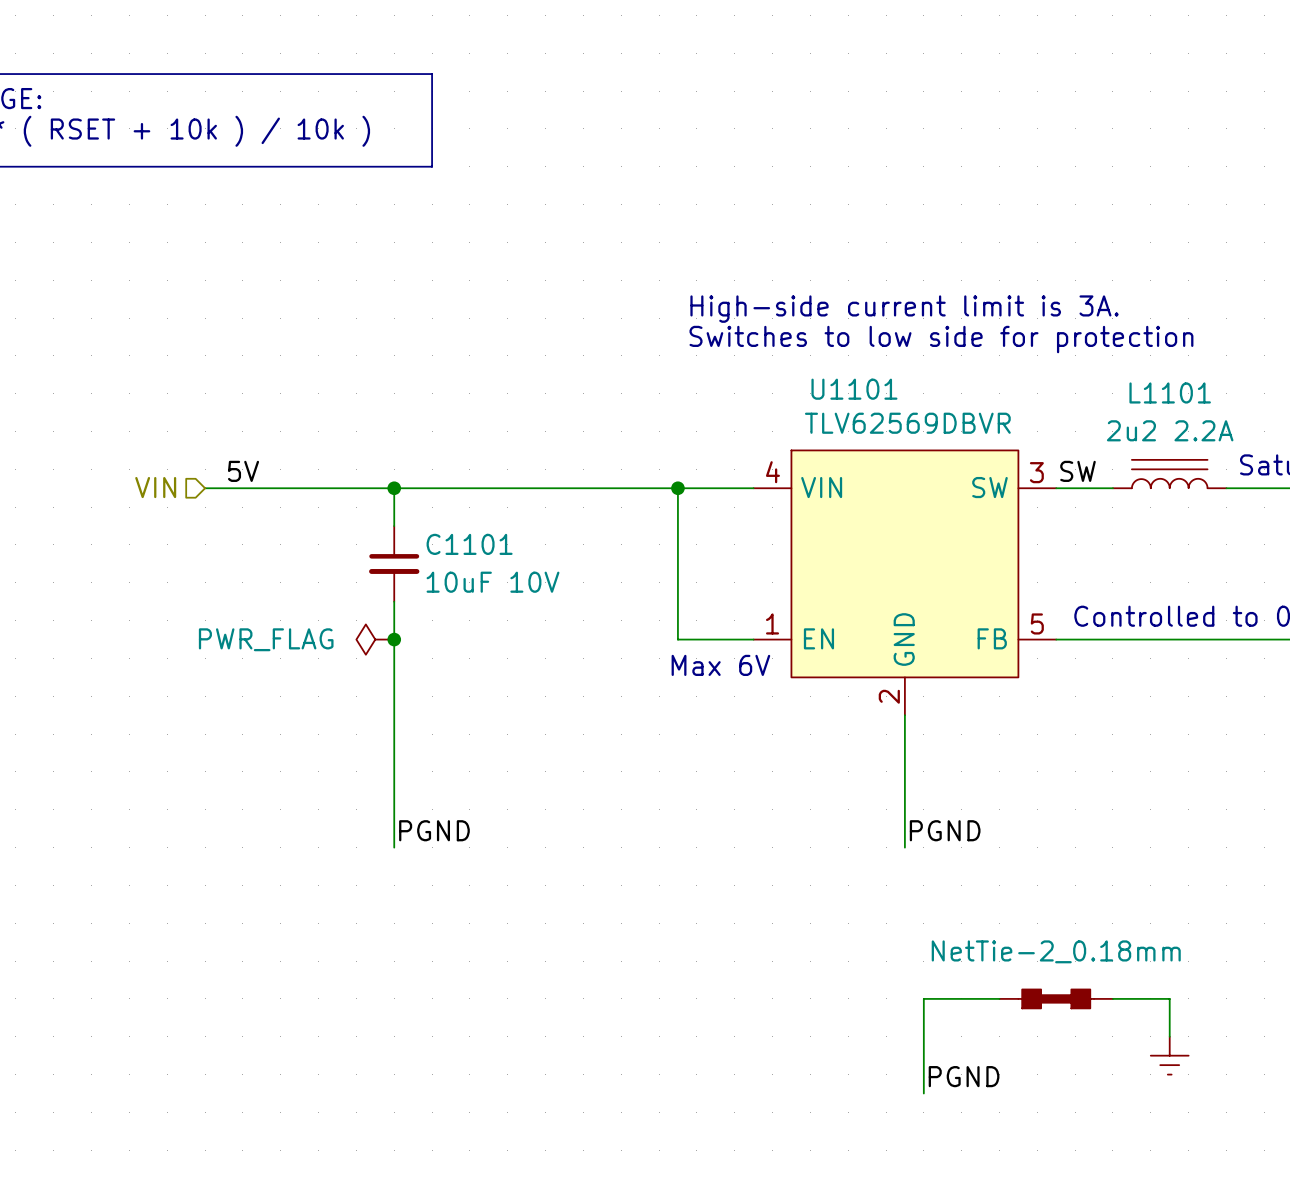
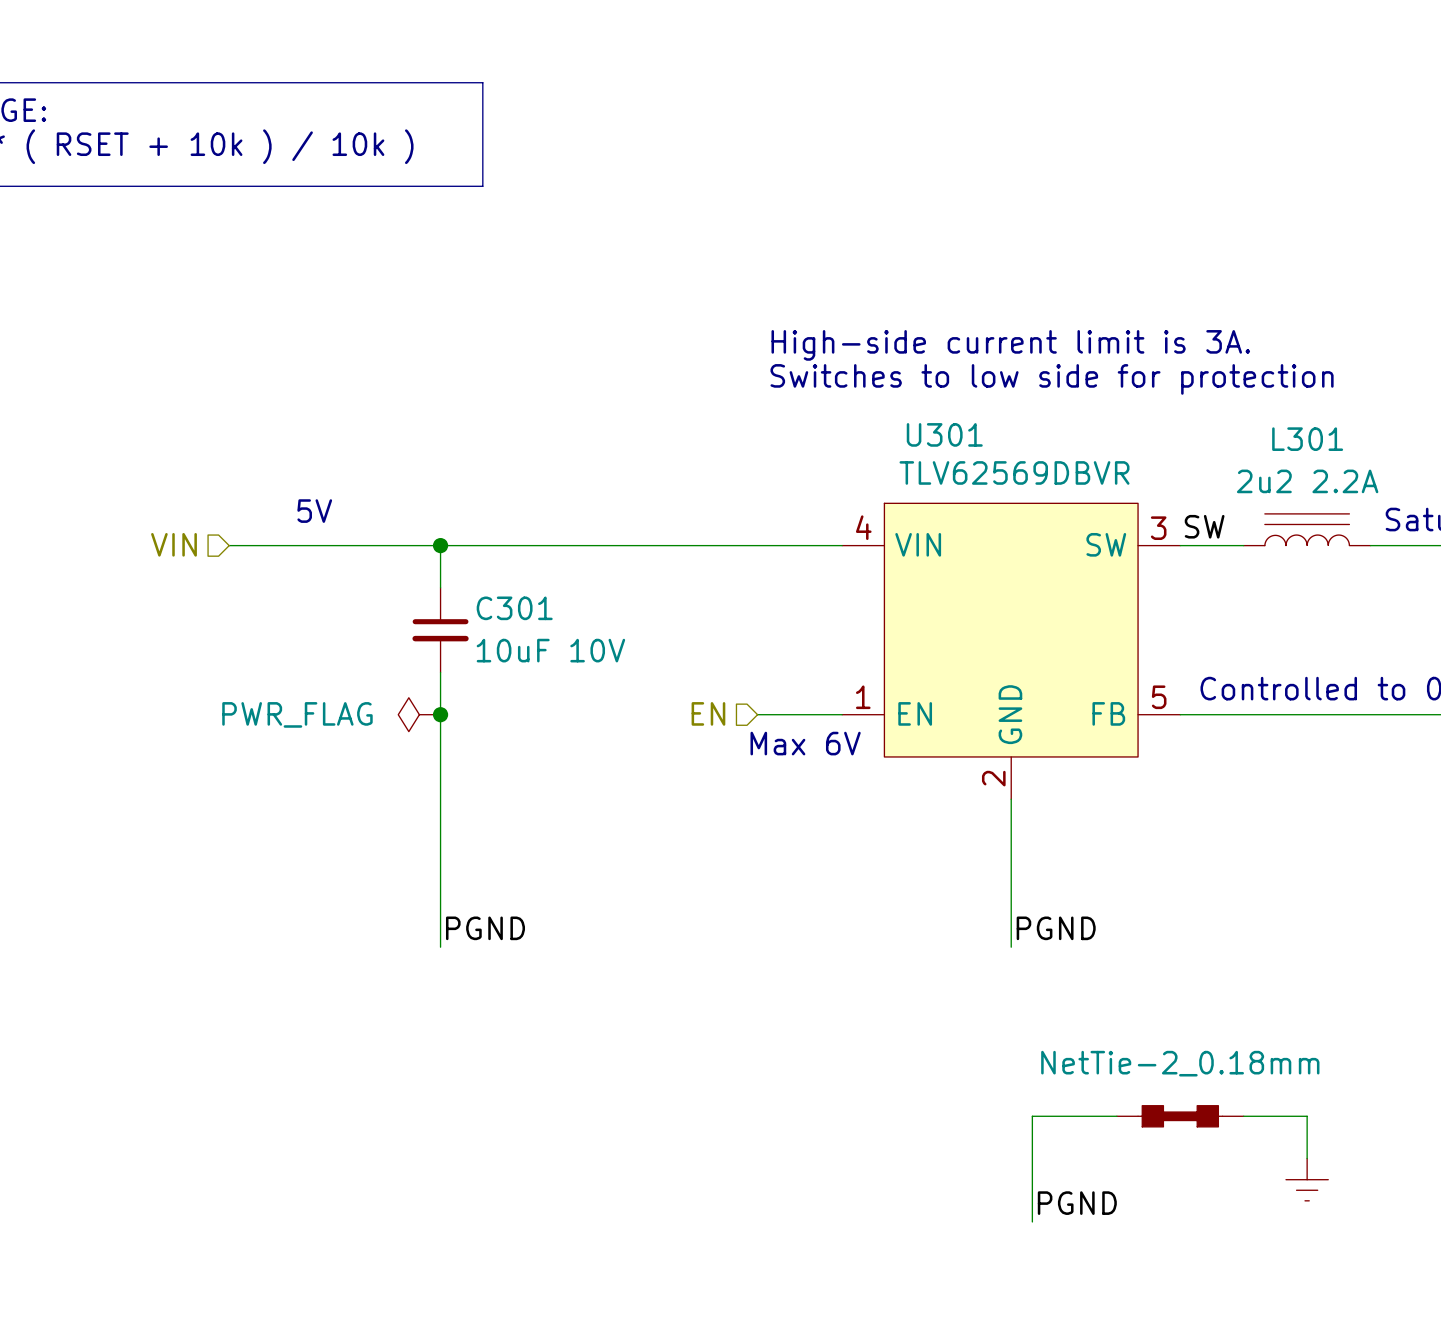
U1101 name: U1101 (854, 389) -> U301 (944, 434)
L1101 name: L1101 (1170, 392) -> L301 (1307, 439)
text: none -> 5V (314, 511)
label: 5V (243, 471) -> none
wire: (677, 488) (677, 639) -> none
junction: (677, 488) -> none
C1101 name: C1101 (469, 544) -> C301 (514, 608)
hierarchical label: none -> EN (708, 713)

